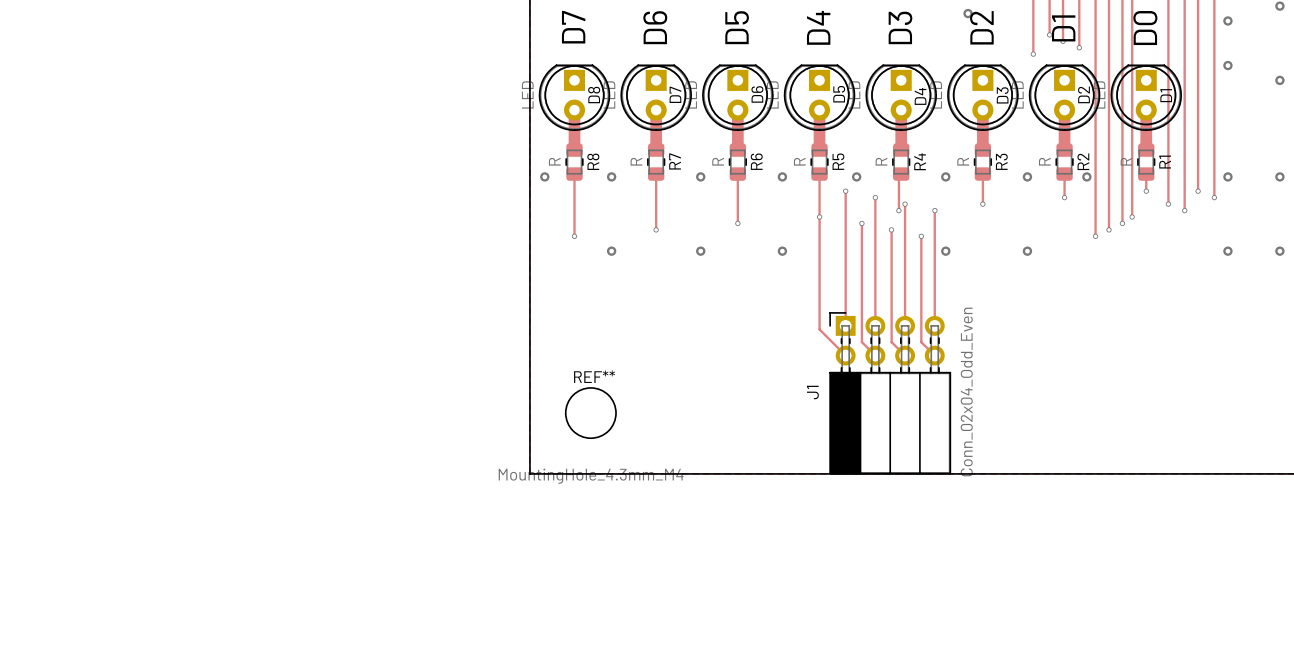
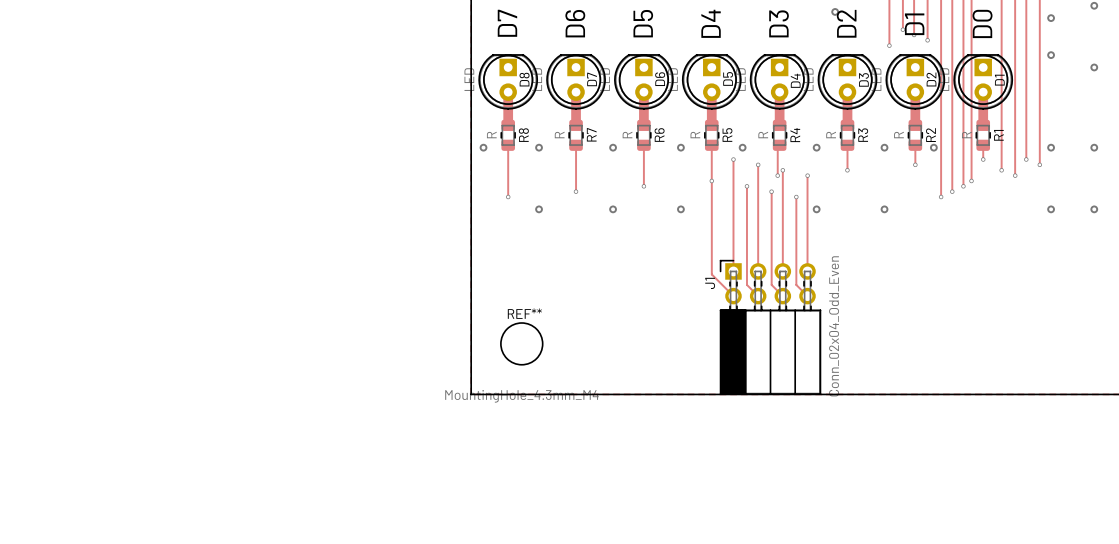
J1 name position: J1 (812, 392) -> J1 (710, 283)

